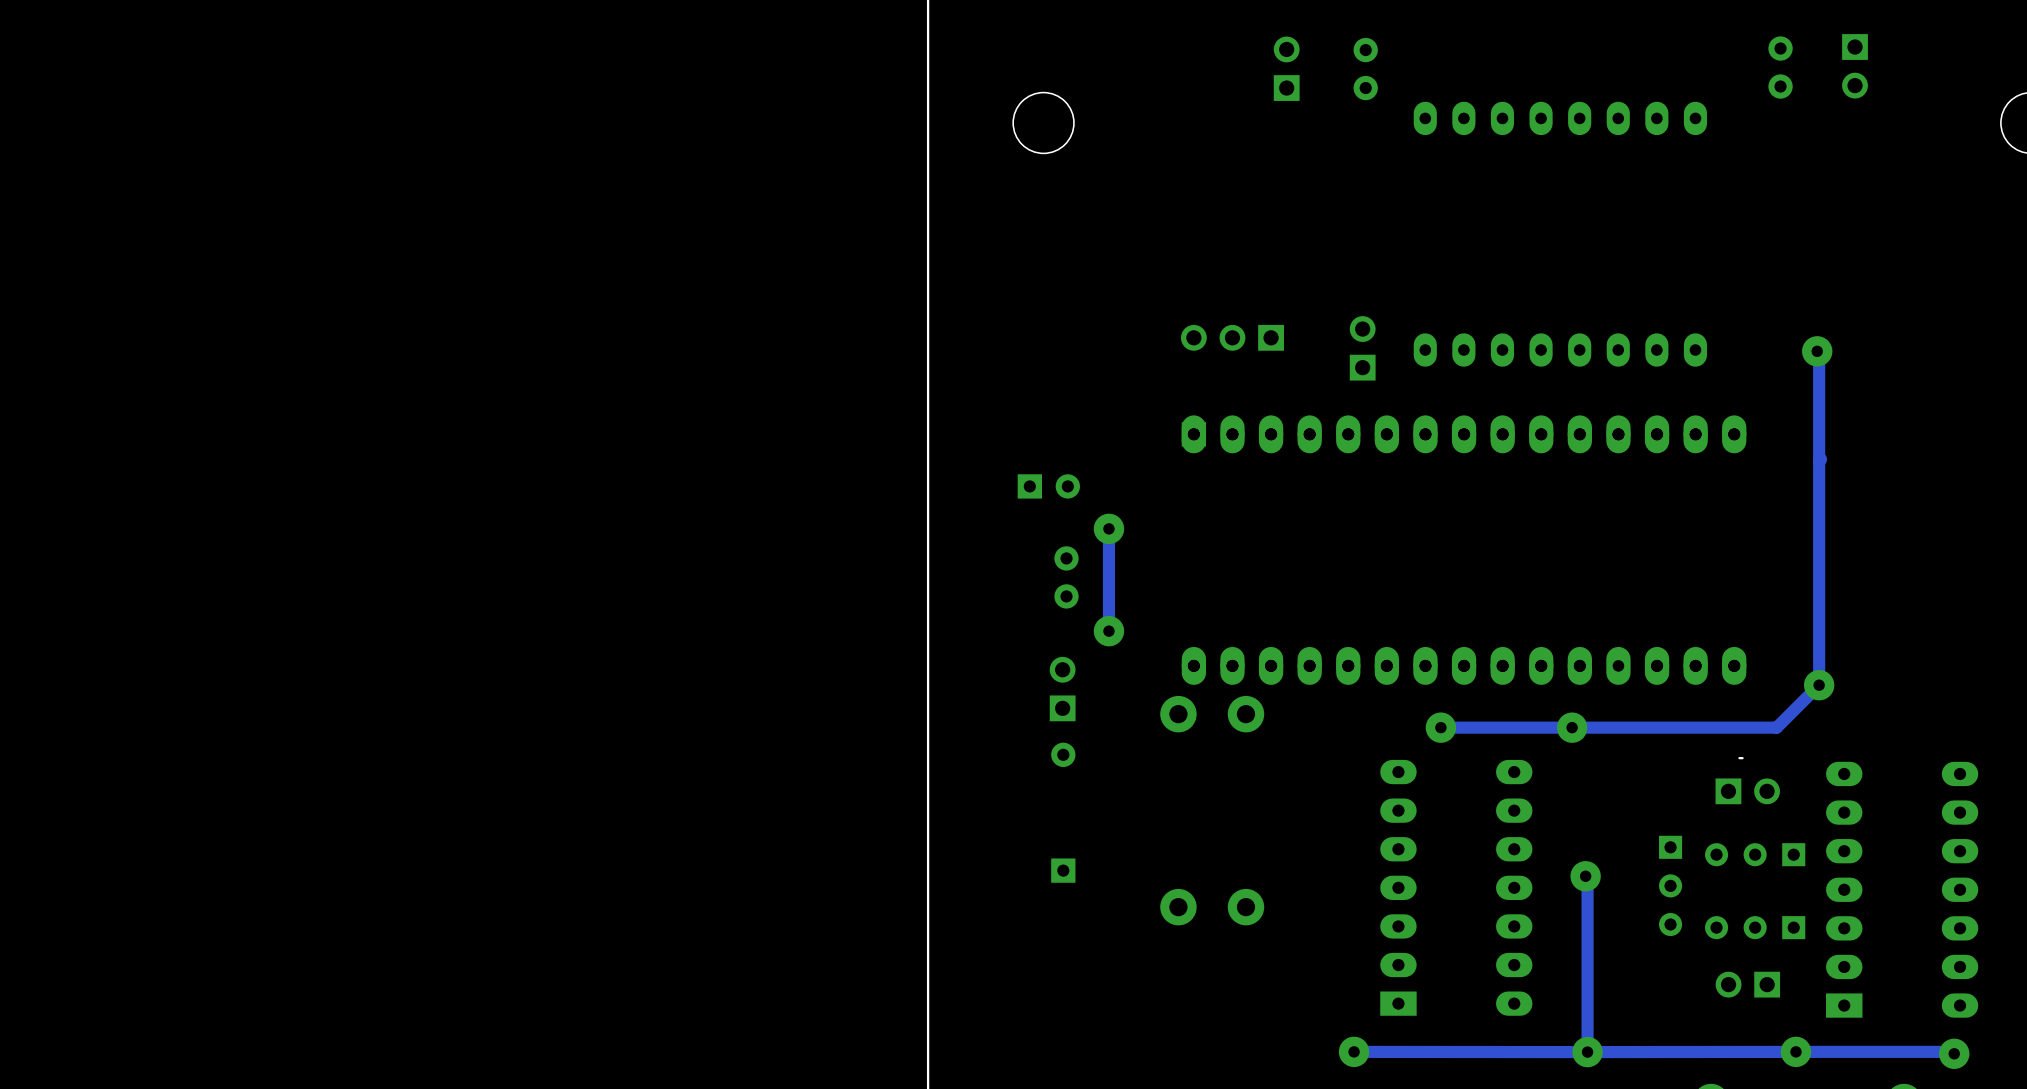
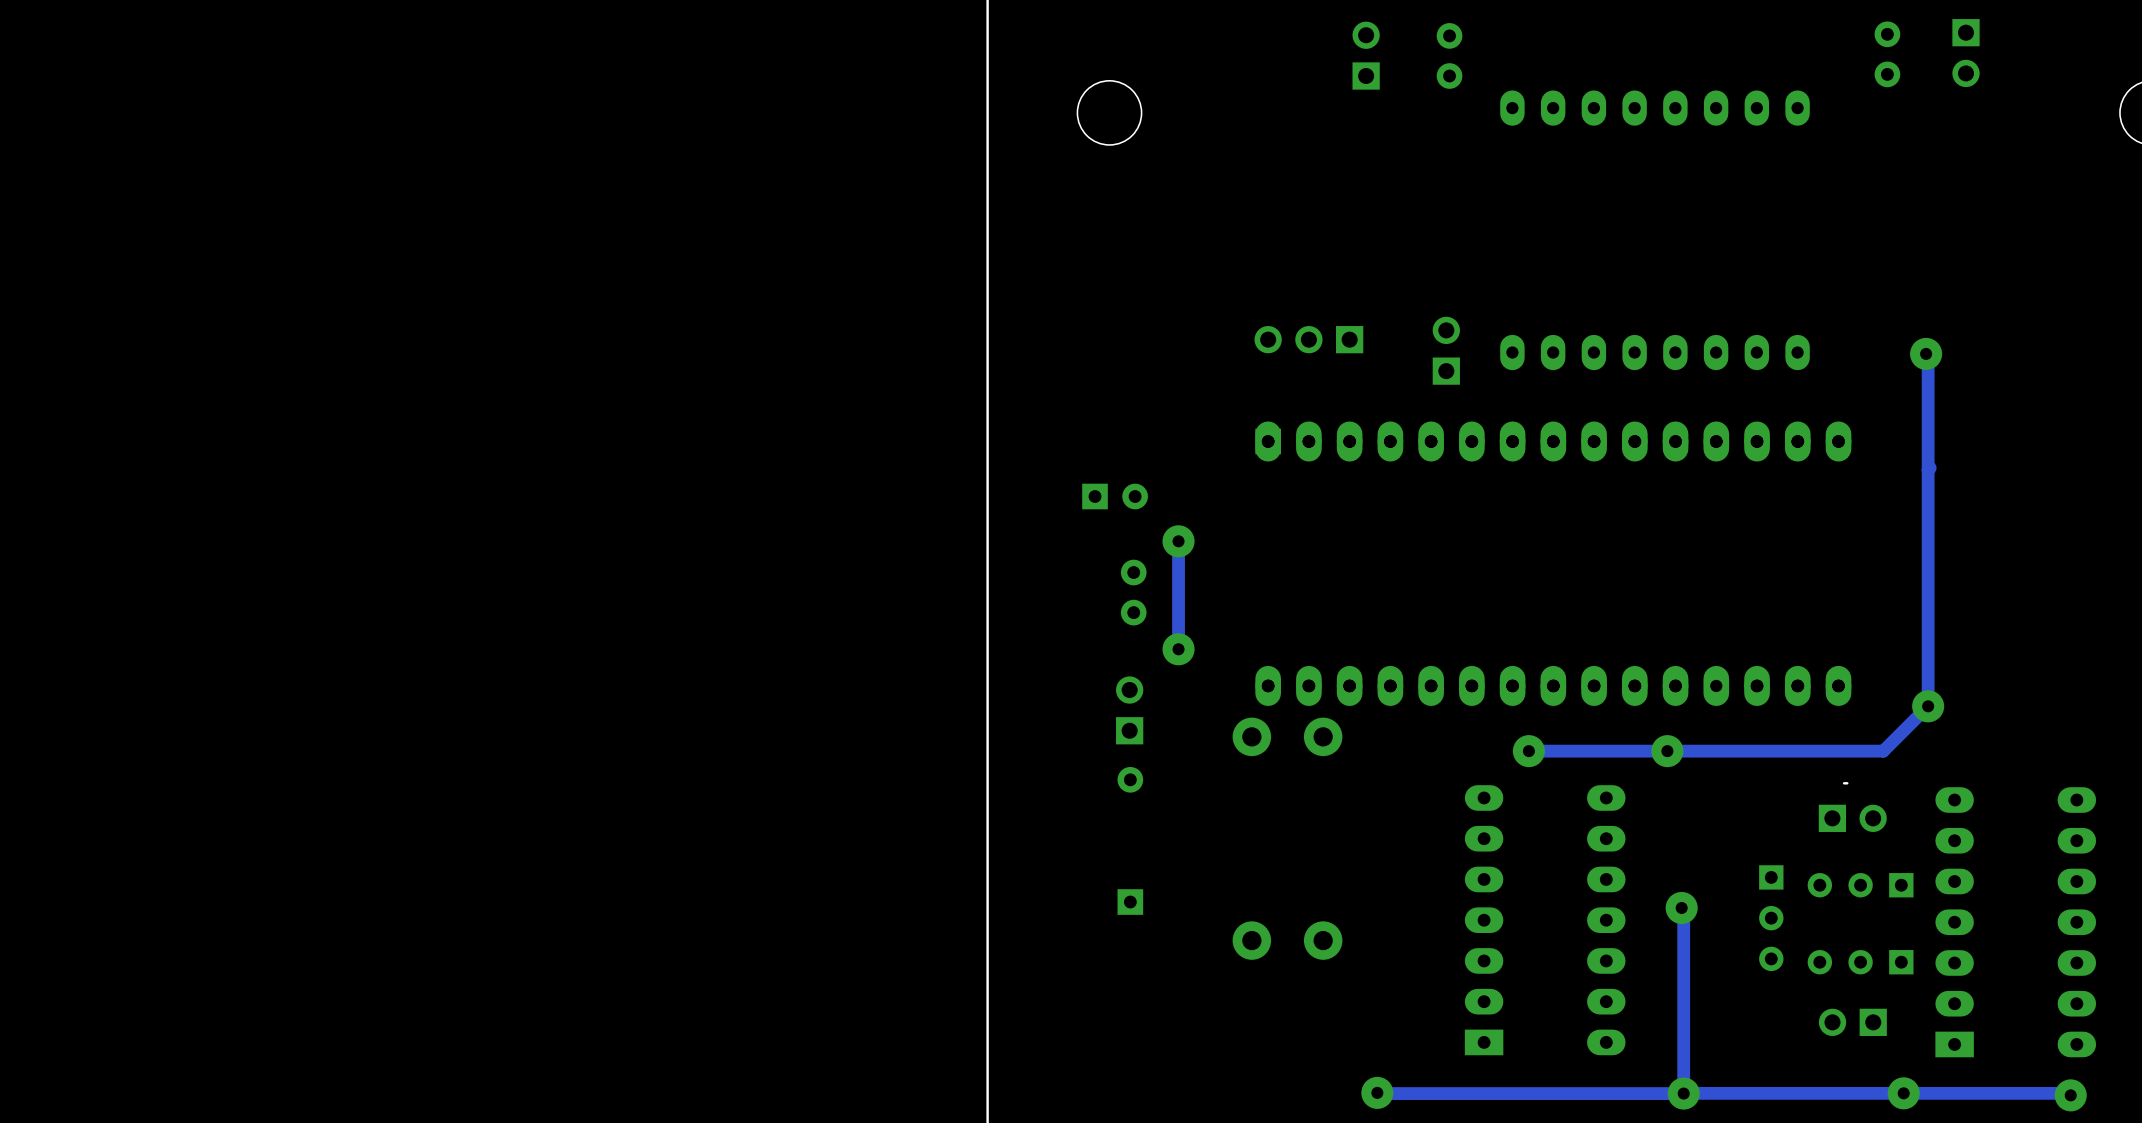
via position: (1354, 1051) -> (1377, 1092)
track: (1795, 1051) (1354, 1051) -> (1903, 1093) (1377, 1092)

